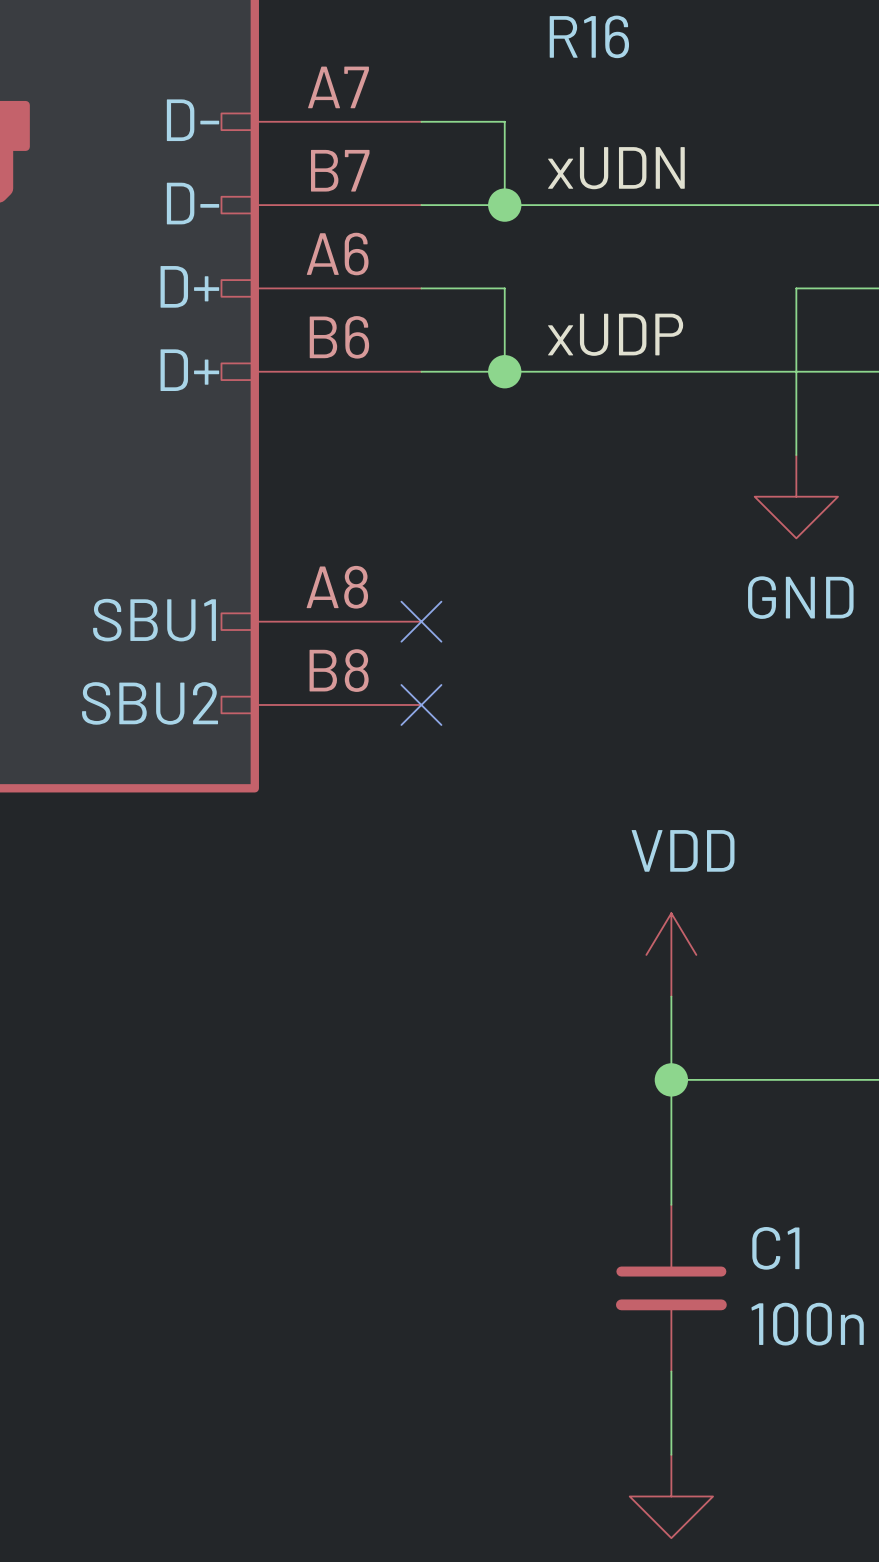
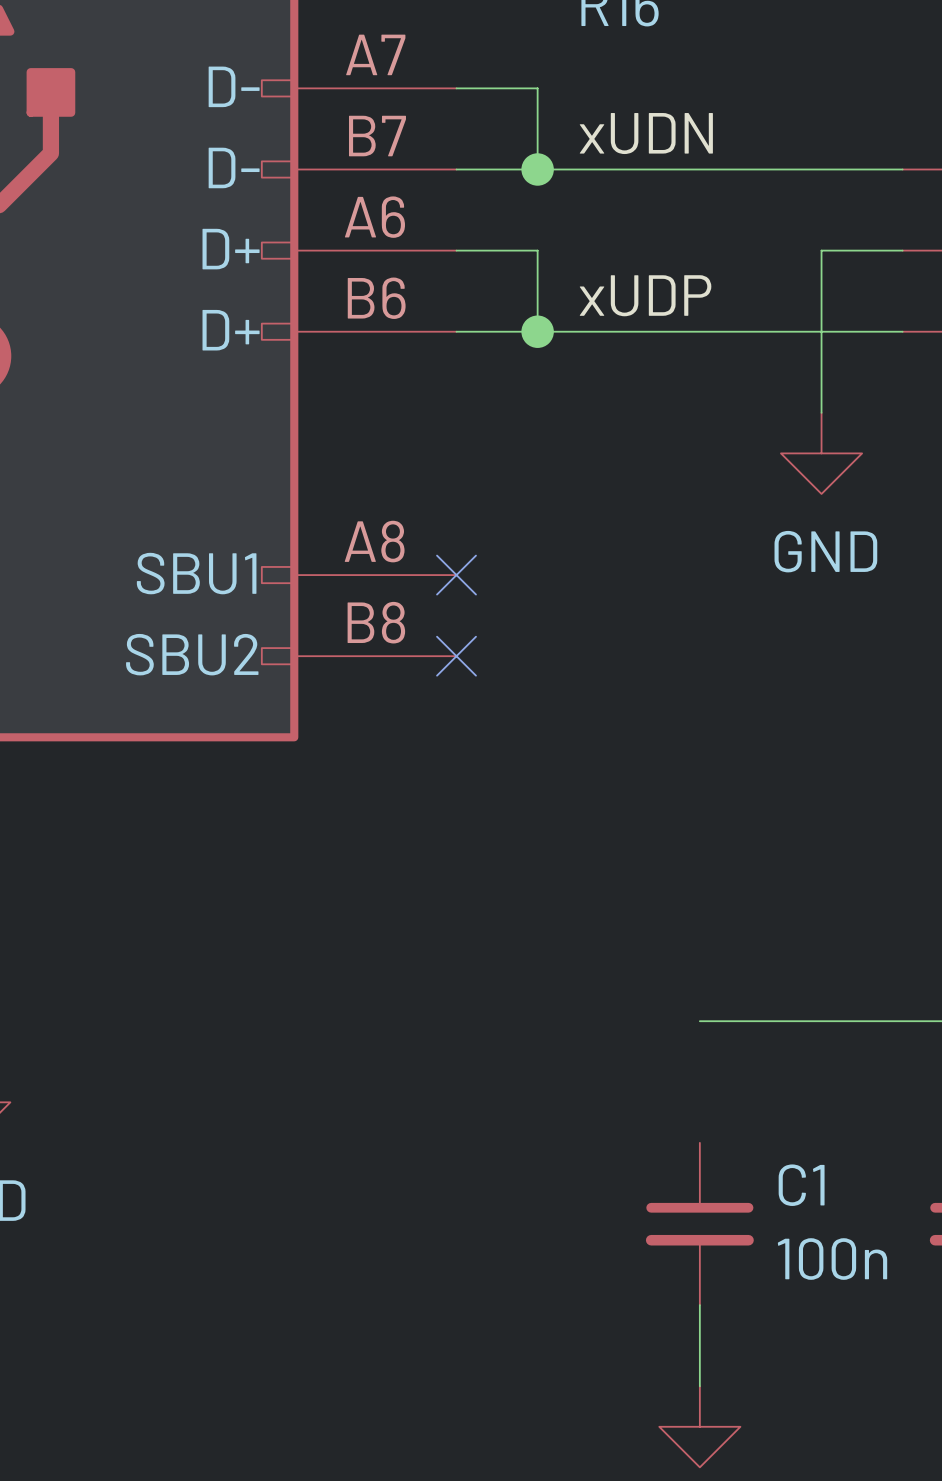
power symbol: VDD (671, 954) -> none
wire: (671, 996) (671, 1204) -> none
junction: (671, 1079) -> none

